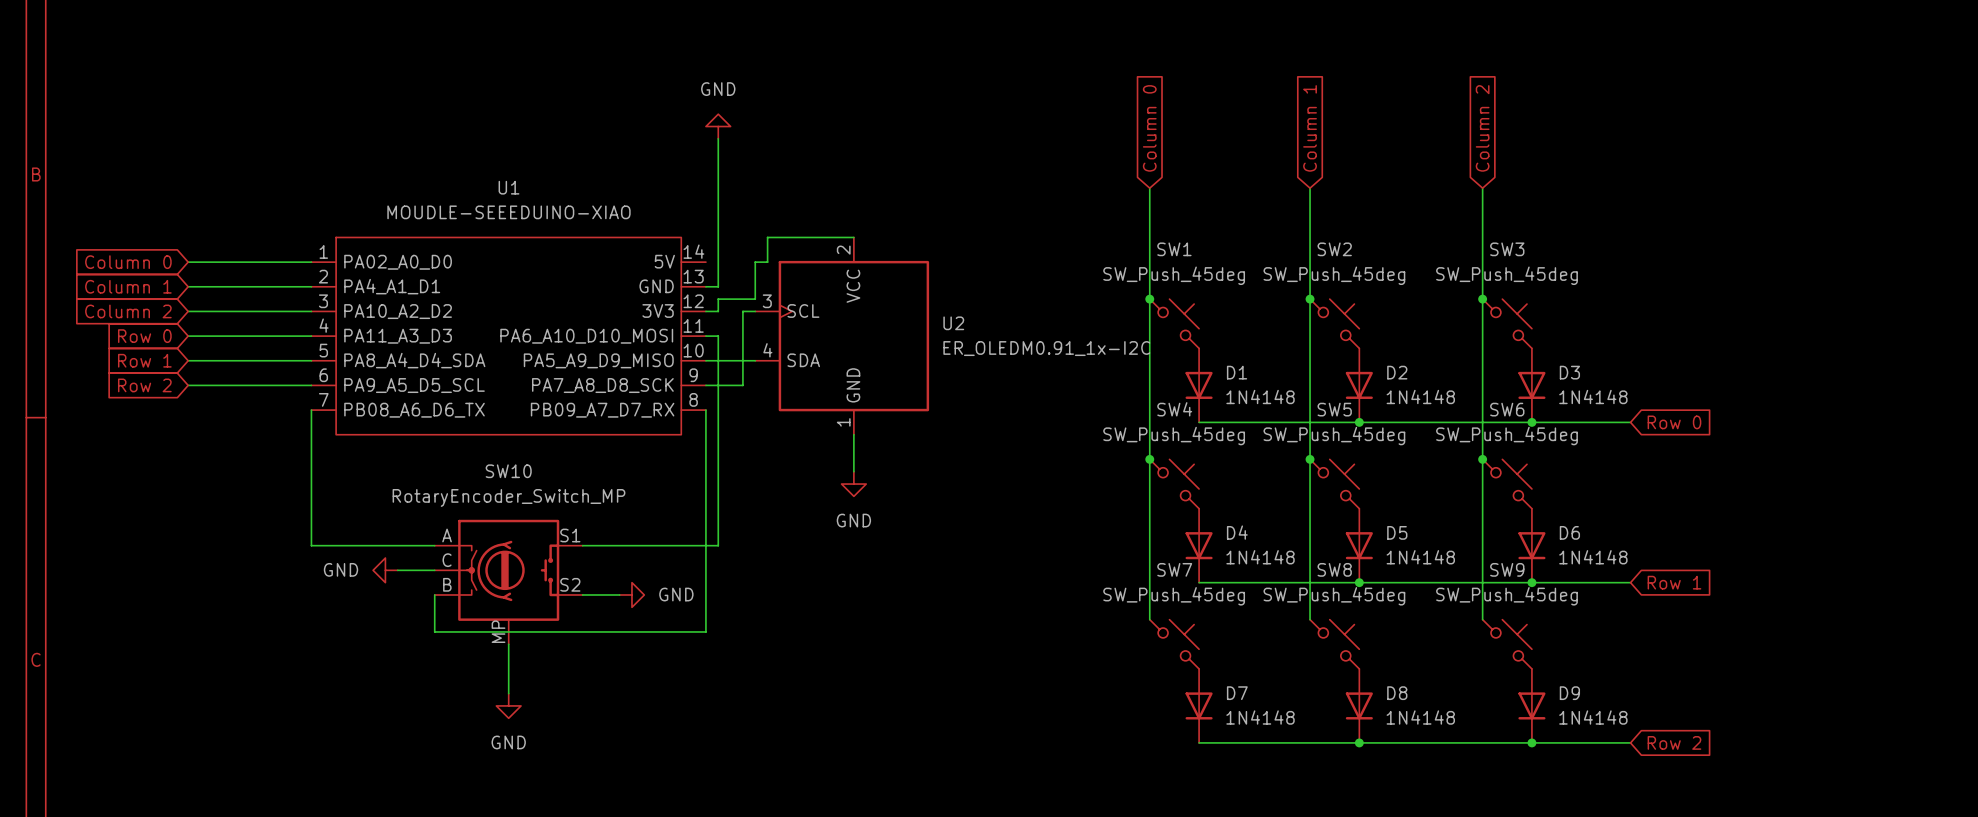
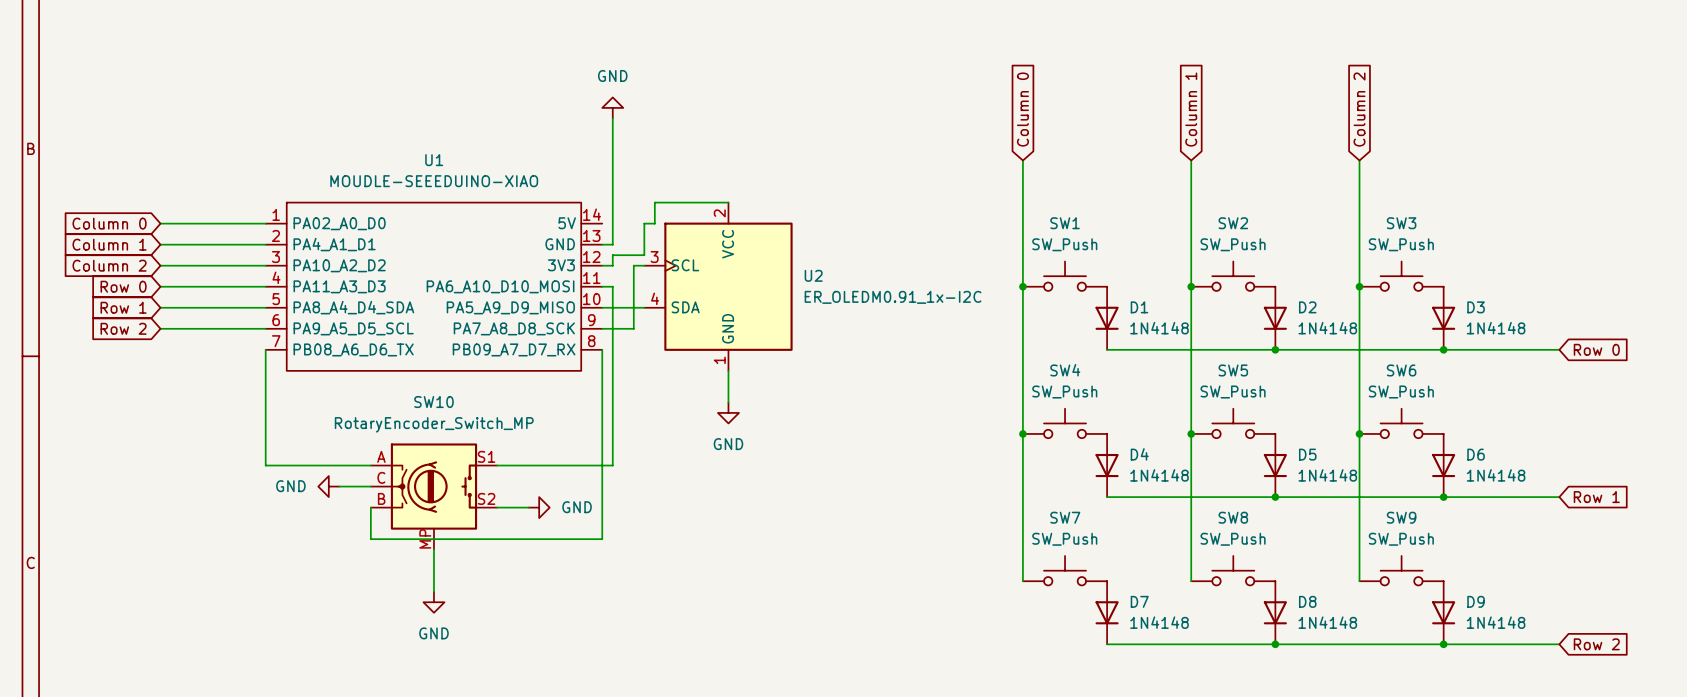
global label position: Column 0 (1149, 128) -> Column 0 (1022, 109)
global label position: Column 1 (1310, 128) -> Column 1 (1191, 109)
global label position: Column 2 (1482, 128) -> Column 2 (1359, 109)
wire: (1149, 188) (1149, 619) -> none
wire: none -> (1022, 160) (1022, 581)
wire: (1310, 188) (1310, 619) -> none
wire: none -> (1191, 160) (1191, 581)
wire: (1482, 188) (1482, 619) -> none
wire: none -> (1359, 160) (1359, 581)
SW1 value: SW_Push_45deg (1174, 275) -> SW_Push (1064, 244)
SW2 value: SW_Push_45deg (1334, 275) -> SW_Push (1233, 244)
SW3 value: SW_Push_45deg (1506, 275) -> SW_Push (1401, 244)
junction: (1149, 299) -> none
SW1 symbol: [1149, 299, 1200, 349] -> [1022, 261, 1108, 291]
junction: (1310, 299) -> none
SW2 symbol: [1310, 299, 1360, 349] -> [1191, 261, 1276, 291]
junction: (1482, 299) -> none
SW3 symbol: [1482, 299, 1532, 349] -> [1359, 261, 1444, 291]
junction: none -> (1022, 286)
junction: none -> (1191, 286)
junction: none -> (1359, 286)
D1 position: (1199, 385) -> (1107, 318)
D2 position: (1359, 385) -> (1275, 318)
D3 position: (1531, 385) -> (1443, 318)
wire: none -> (1107, 349) (1559, 349)
junction: none -> (1275, 349)
junction: none -> (1443, 349)
wire: (1199, 422) (1630, 422) -> none
junction: (1359, 422) -> none
junction: (1531, 422) -> none
global label position: Row 0 (1674, 422) -> Row 0 (1596, 349)
SW4 value: SW_Push_45deg (1174, 436) -> SW_Push (1064, 392)
SW5 value: SW_Push_45deg (1334, 436) -> SW_Push (1233, 392)
SW6 value: SW_Push_45deg (1506, 436) -> SW_Push (1401, 392)
junction: (1149, 459) -> none
SW4 symbol: [1149, 459, 1200, 509] -> [1022, 408, 1108, 439]
junction: (1310, 459) -> none
SW5 symbol: [1310, 459, 1360, 509] -> [1191, 408, 1276, 439]
junction: (1482, 459) -> none
SW6 symbol: [1482, 459, 1532, 509] -> [1359, 408, 1444, 439]
junction: none -> (1022, 433)
junction: none -> (1191, 433)
junction: none -> (1359, 433)
D4 position: (1199, 545) -> (1107, 465)
D5 position: (1359, 545) -> (1275, 465)
D6 position: (1531, 545) -> (1443, 465)
wire: (1199, 582) (1297, 582) -> none
junction: (1359, 582) -> none
junction position: (1531, 582) -> (1275, 497)
wire: none -> (1391, 497) (1559, 497)
global label position: Row 1 (1674, 582) -> Row 1 (1596, 497)
junction: none -> (1443, 497)
SW7 value: SW_Push_45deg (1174, 596) -> SW_Push (1064, 539)
SW8 value: SW_Push_45deg (1334, 596) -> SW_Push (1233, 539)
SW9 value: SW_Push_45deg (1506, 596) -> SW_Push (1401, 539)
SW7 symbol: [1149, 619, 1200, 669] -> [1022, 555, 1108, 586]
SW8 symbol: [1310, 619, 1360, 669] -> [1191, 555, 1276, 586]
SW9 symbol: [1482, 619, 1532, 669] -> [1359, 555, 1444, 586]
D7 position: (1199, 705) -> (1107, 612)
D8 position: (1359, 705) -> (1275, 612)
D9 position: (1531, 705) -> (1443, 612)
wire: (1199, 742) (1630, 742) -> none
junction: (1359, 742) -> none
junction position: (1531, 742) -> (1275, 644)
global label position: Row 2 (1674, 742) -> Row 2 (1596, 644)
wire: none -> (1107, 644) (1559, 644)
junction: none -> (1443, 644)

